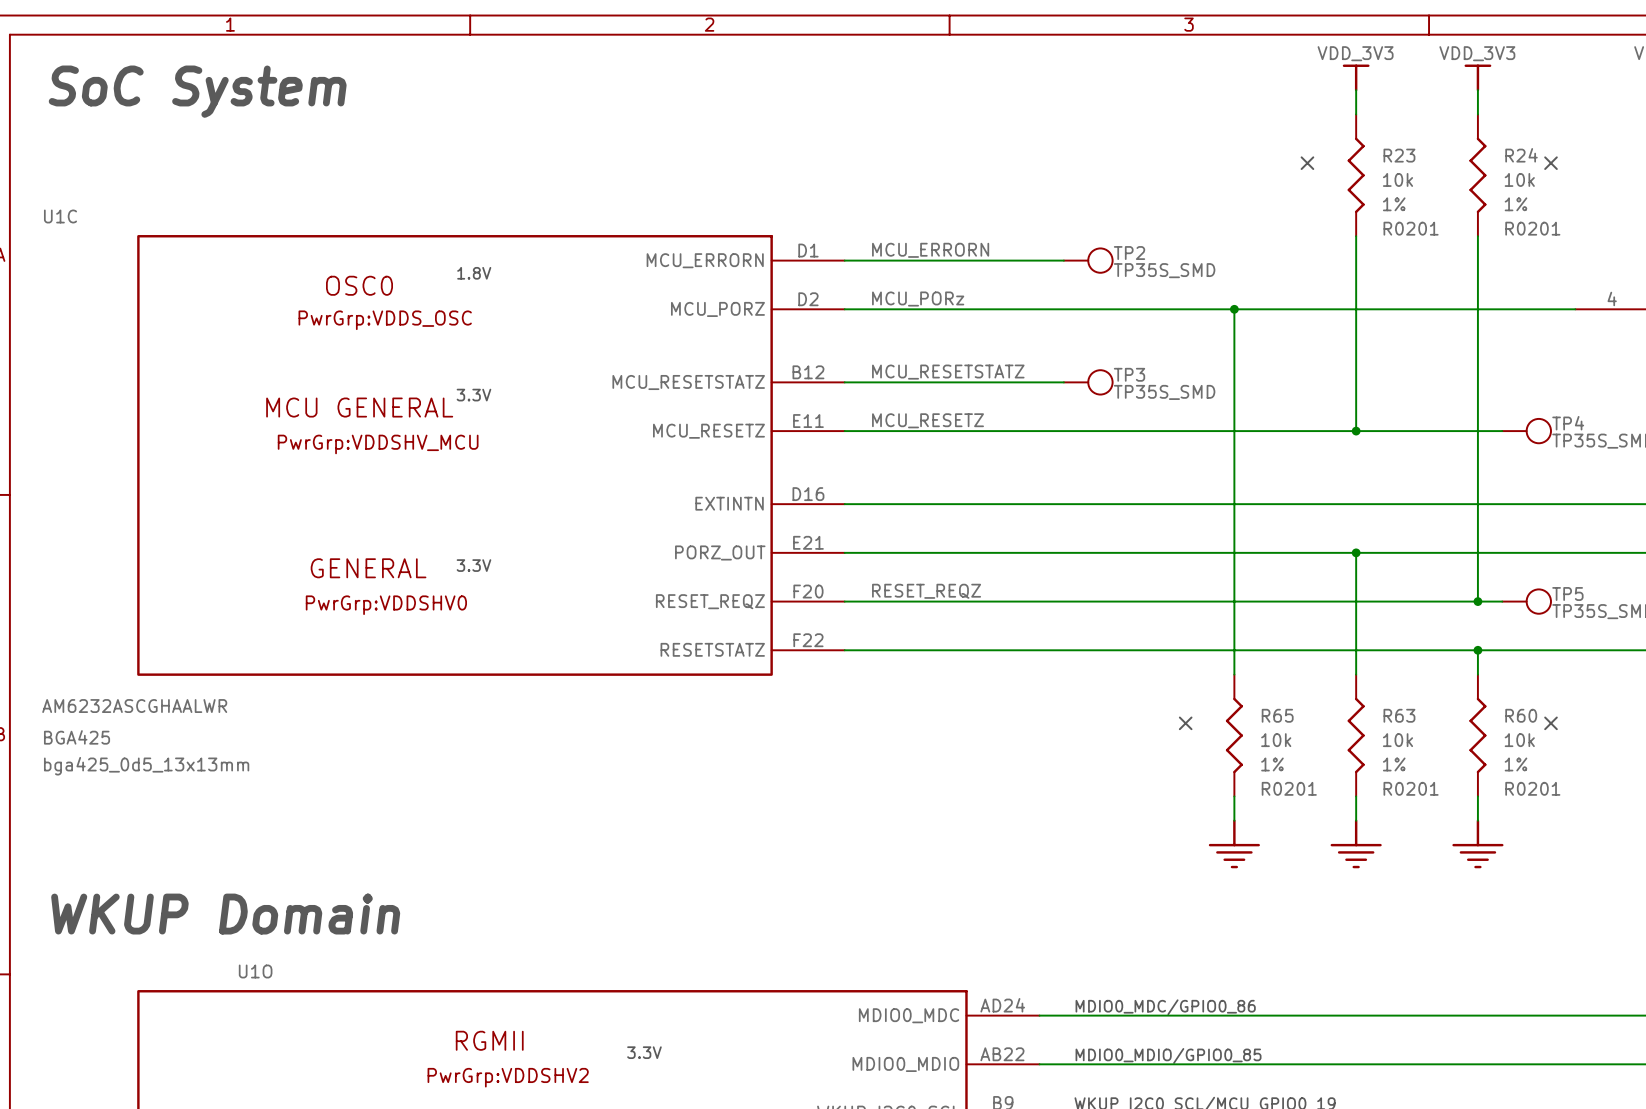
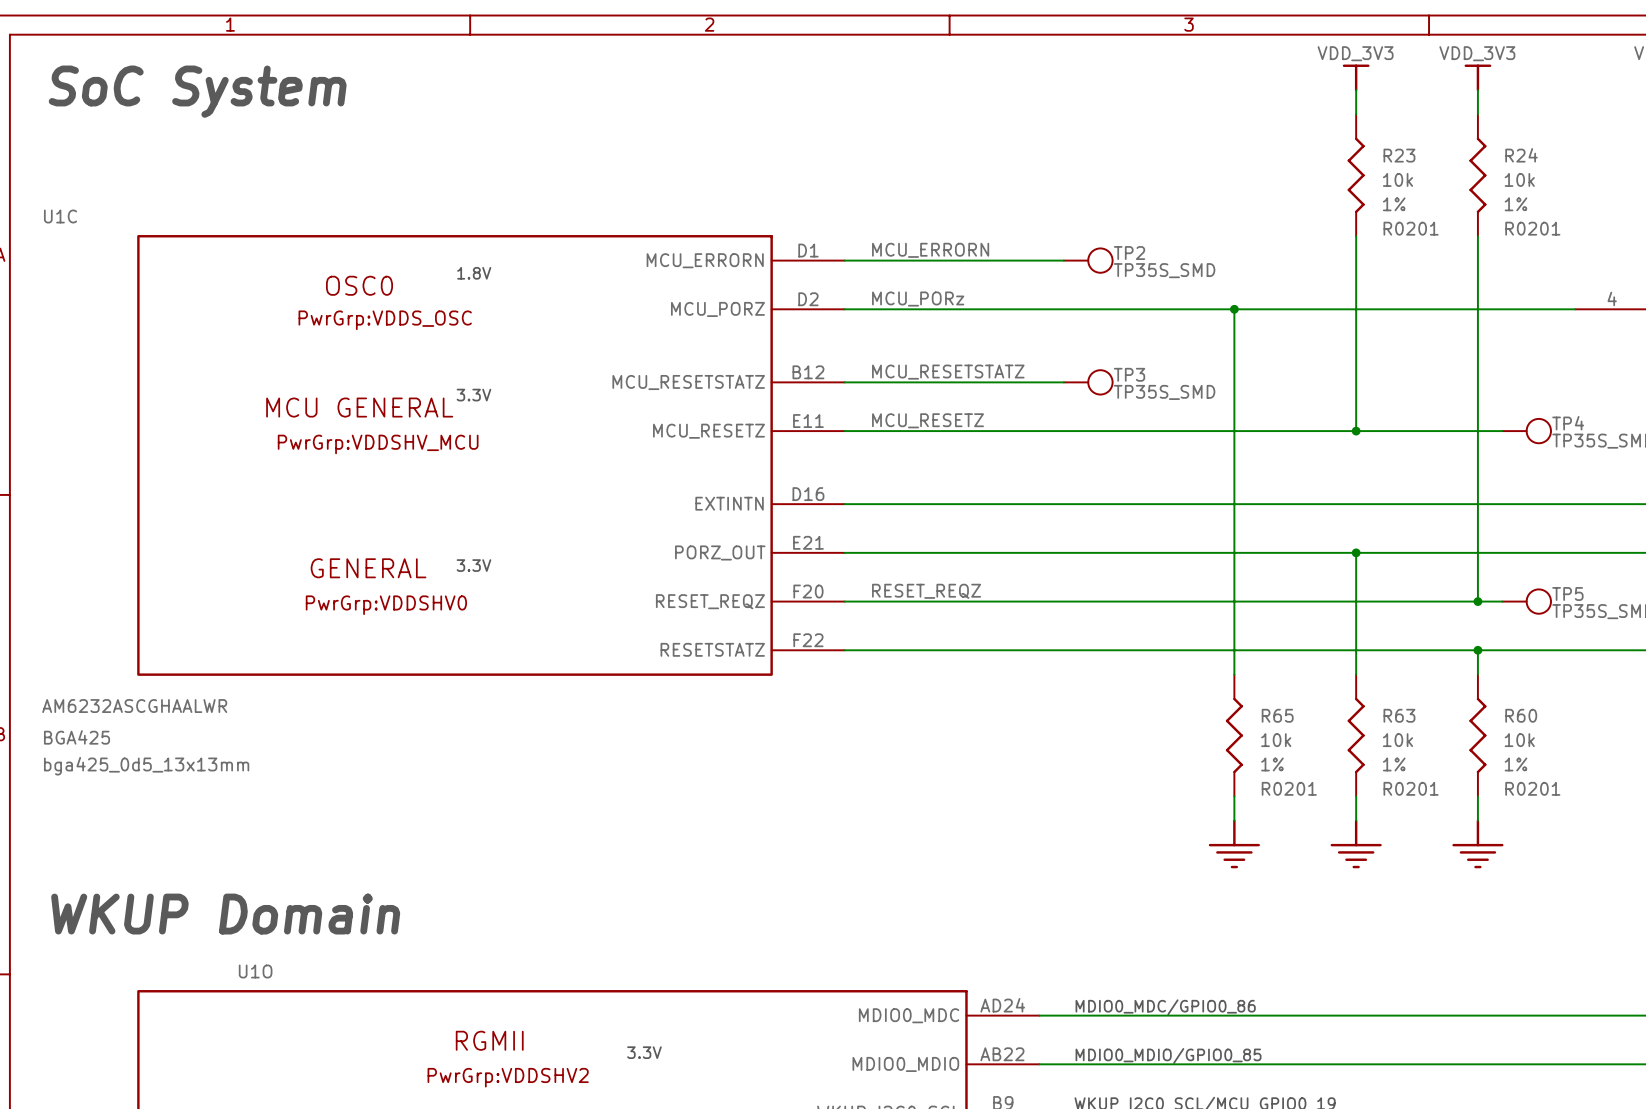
no-connect mark: (1307, 163) -> none
no-connect mark: (1551, 163) -> none
no-connect mark: (1185, 723) -> none
no-connect mark: (1551, 723) -> none

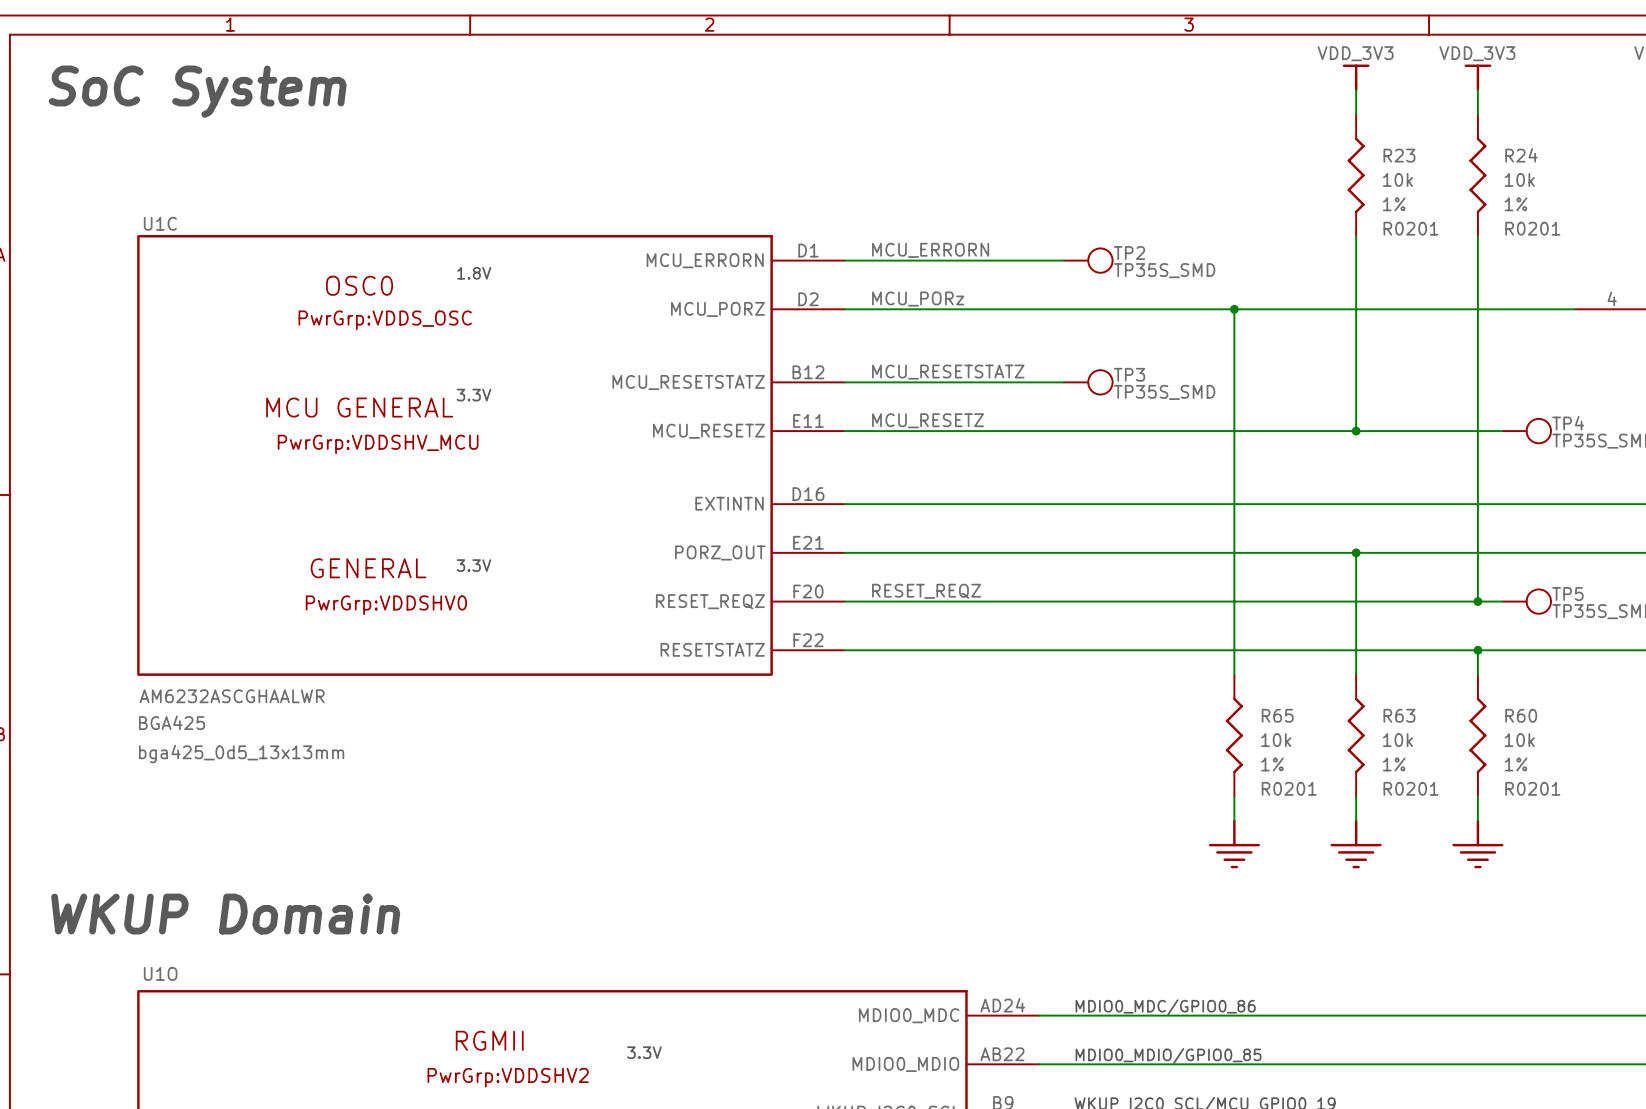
U1C name position: U1C (60, 216) -> U1C (160, 223)
U1C value position: AM6232ASCGHAALWR (134, 706) -> AM6232ASCGHAALWR (232, 696)
U1C text position: BGA425 (77, 737) -> BGA425 (172, 722)
U1C text position: bga425_0d5_13x13mm (146, 766) -> bga425_0d5_13x13mm (241, 754)
U1O name position: U1O (255, 971) -> U1O (160, 973)

